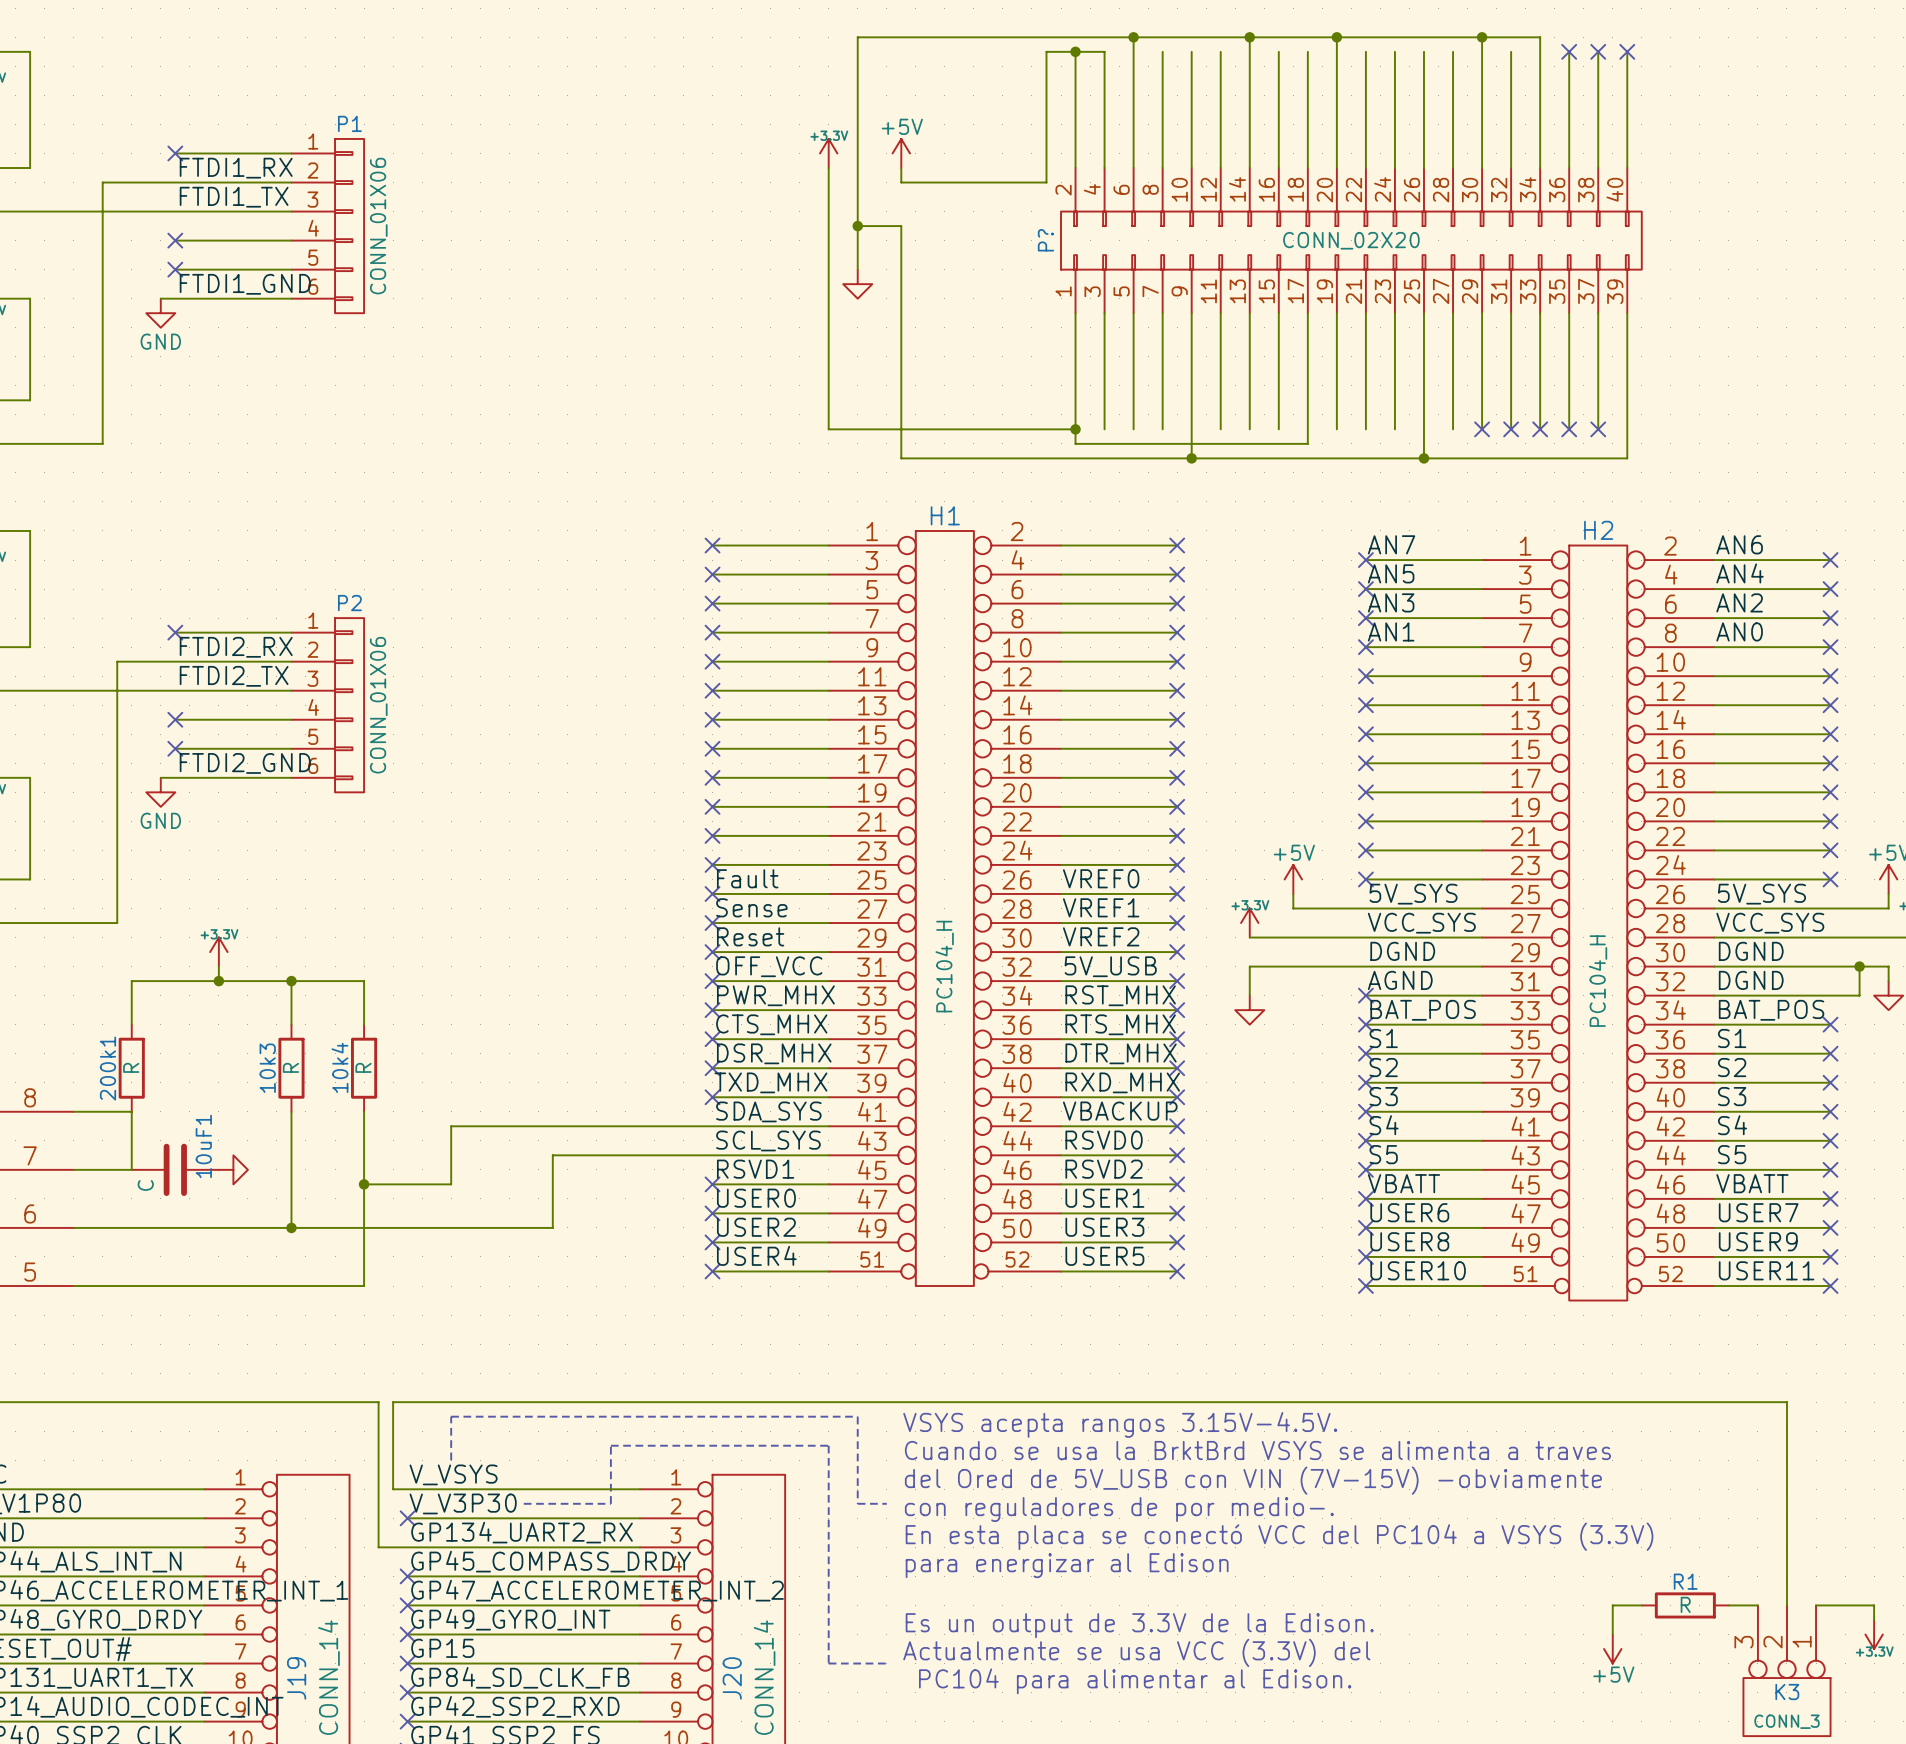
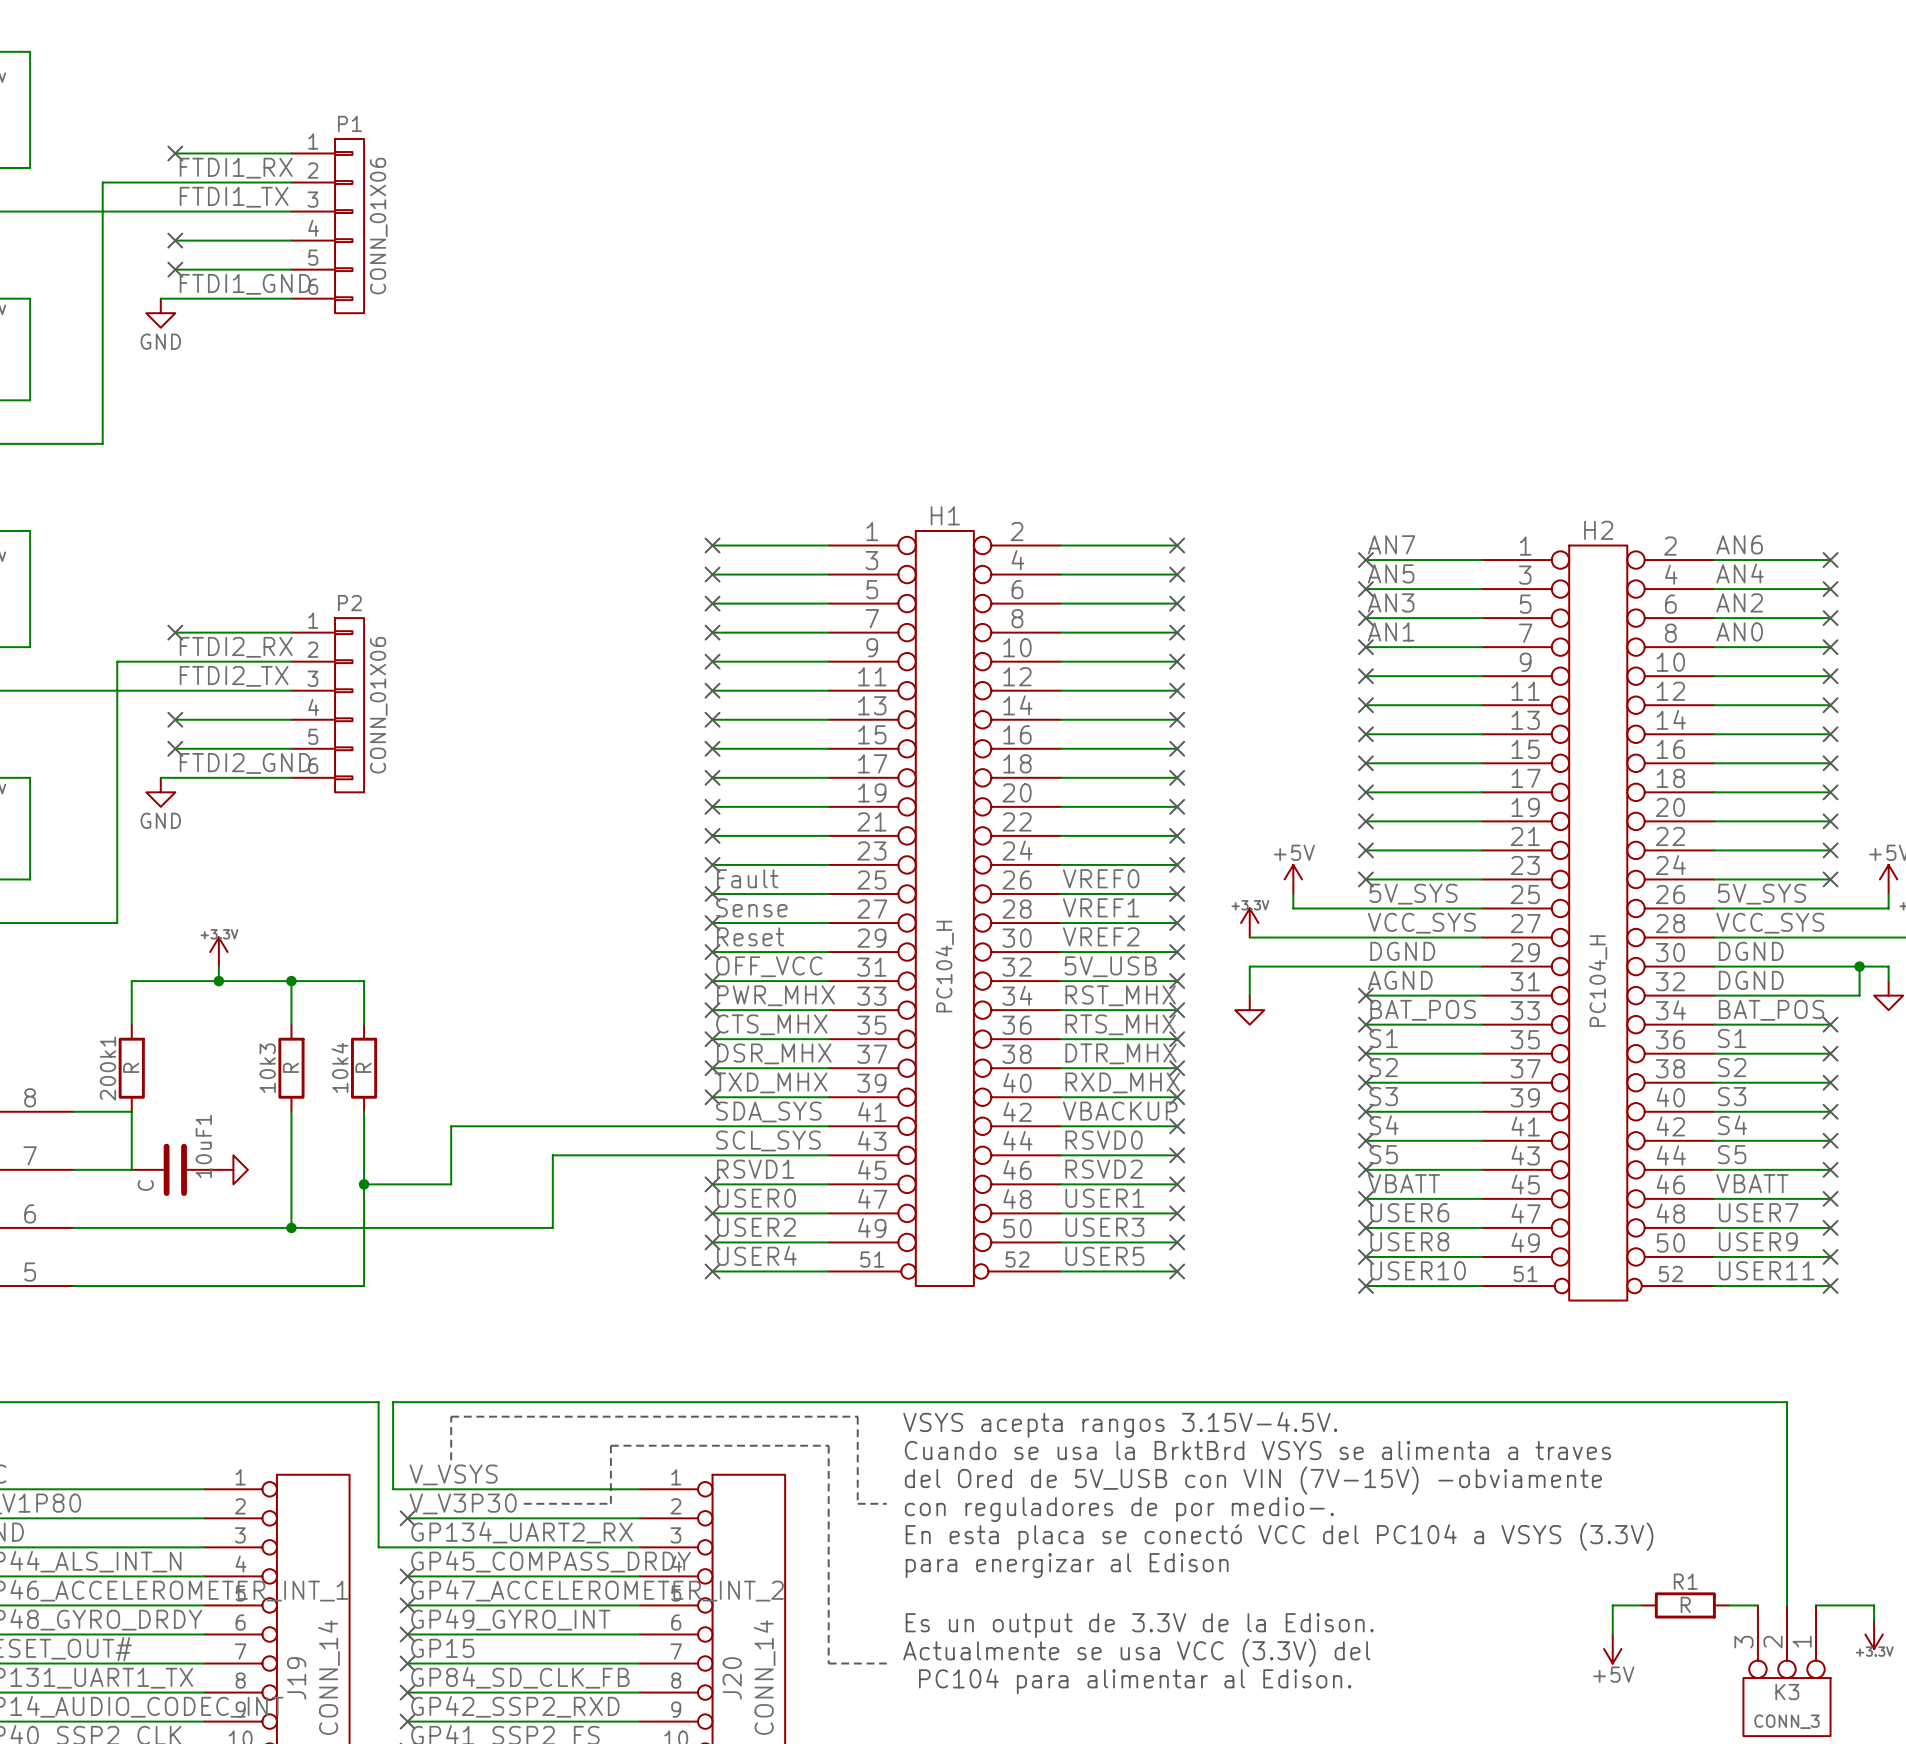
wire: (1133, 37) (1133, 168) -> none
junction: (1133, 37) -> none
wire: (1249, 37) (1249, 168) -> none
junction: (1249, 37) -> none
wire: (1336, 37) (1336, 168) -> none
junction: (1336, 37) -> none
wire: (1482, 37) (1482, 168) -> none
junction: (1482, 37) -> none
wire: (1075, 51) (1075, 168) -> none
junction: (1075, 51) -> none
wire: (1162, 51) (1162, 168) -> none
wire: (1191, 51) (1191, 168) -> none
wire: (1220, 51) (1220, 168) -> none
wire: (1278, 51) (1278, 168) -> none
wire: (1307, 51) (1307, 168) -> none
wire: (1365, 51) (1365, 168) -> none
wire: (1394, 51) (1394, 168) -> none
wire: (1424, 51) (1424, 168) -> none
wire: (1453, 51) (1453, 168) -> none
wire: (1511, 51) (1511, 168) -> none
wire: (1569, 51) (1569, 168) -> none
no-connect mark: (1569, 51) -> none
wire: (1598, 51) (1598, 168) -> none
no-connect mark: (1598, 51) -> none
wire: (1627, 51) (1627, 168) -> none
no-connect mark: (1627, 51) -> none
power symbol: +3.3V (828, 153) -> none
power symbol: +5V (901, 153) -> none
wire: (828, 168) (828, 429) (1075, 429) -> none
wire: (901, 168) (901, 182) (1046, 182) (1046, 51) (1104, 51) (1104, 168) -> none
wire: (1540, 168) (1540, 37) (857, 37) (857, 269) -> none
wire: (857, 226) (901, 226) (901, 458) (1627, 458) (1627, 313) -> none
junction: (857, 226) -> none
P?: CONN_02X20 (1351, 240) -> none
power symbol: (857, 284) -> none
wire: (1075, 313) (1075, 443) (1307, 443) (1307, 313) -> none
wire: (1104, 313) (1104, 429) -> none
wire: (1133, 313) (1133, 429) -> none
wire: (1162, 313) (1162, 429) -> none
wire: (1191, 313) (1191, 458) -> none
wire: (1220, 313) (1220, 429) -> none
wire: (1249, 313) (1249, 429) -> none
wire: (1278, 313) (1278, 429) -> none
wire: (1336, 313) (1336, 429) -> none
wire: (1365, 313) (1365, 429) -> none
wire: (1394, 313) (1394, 429) -> none
wire: (1424, 313) (1424, 458) -> none
wire: (1453, 313) (1453, 429) -> none
wire: (1482, 313) (1482, 429) -> none
wire: (1511, 313) (1511, 429) -> none
wire: (1540, 313) (1540, 429) -> none
wire: (1569, 313) (1569, 429) -> none
wire: (1598, 313) (1598, 429) -> none
junction: (1075, 429) -> none
no-connect mark: (1482, 429) -> none
no-connect mark: (1511, 429) -> none
no-connect mark: (1540, 429) -> none
no-connect mark: (1569, 429) -> none
no-connect mark: (1598, 429) -> none
junction: (1191, 458) -> none
junction: (1424, 458) -> none

